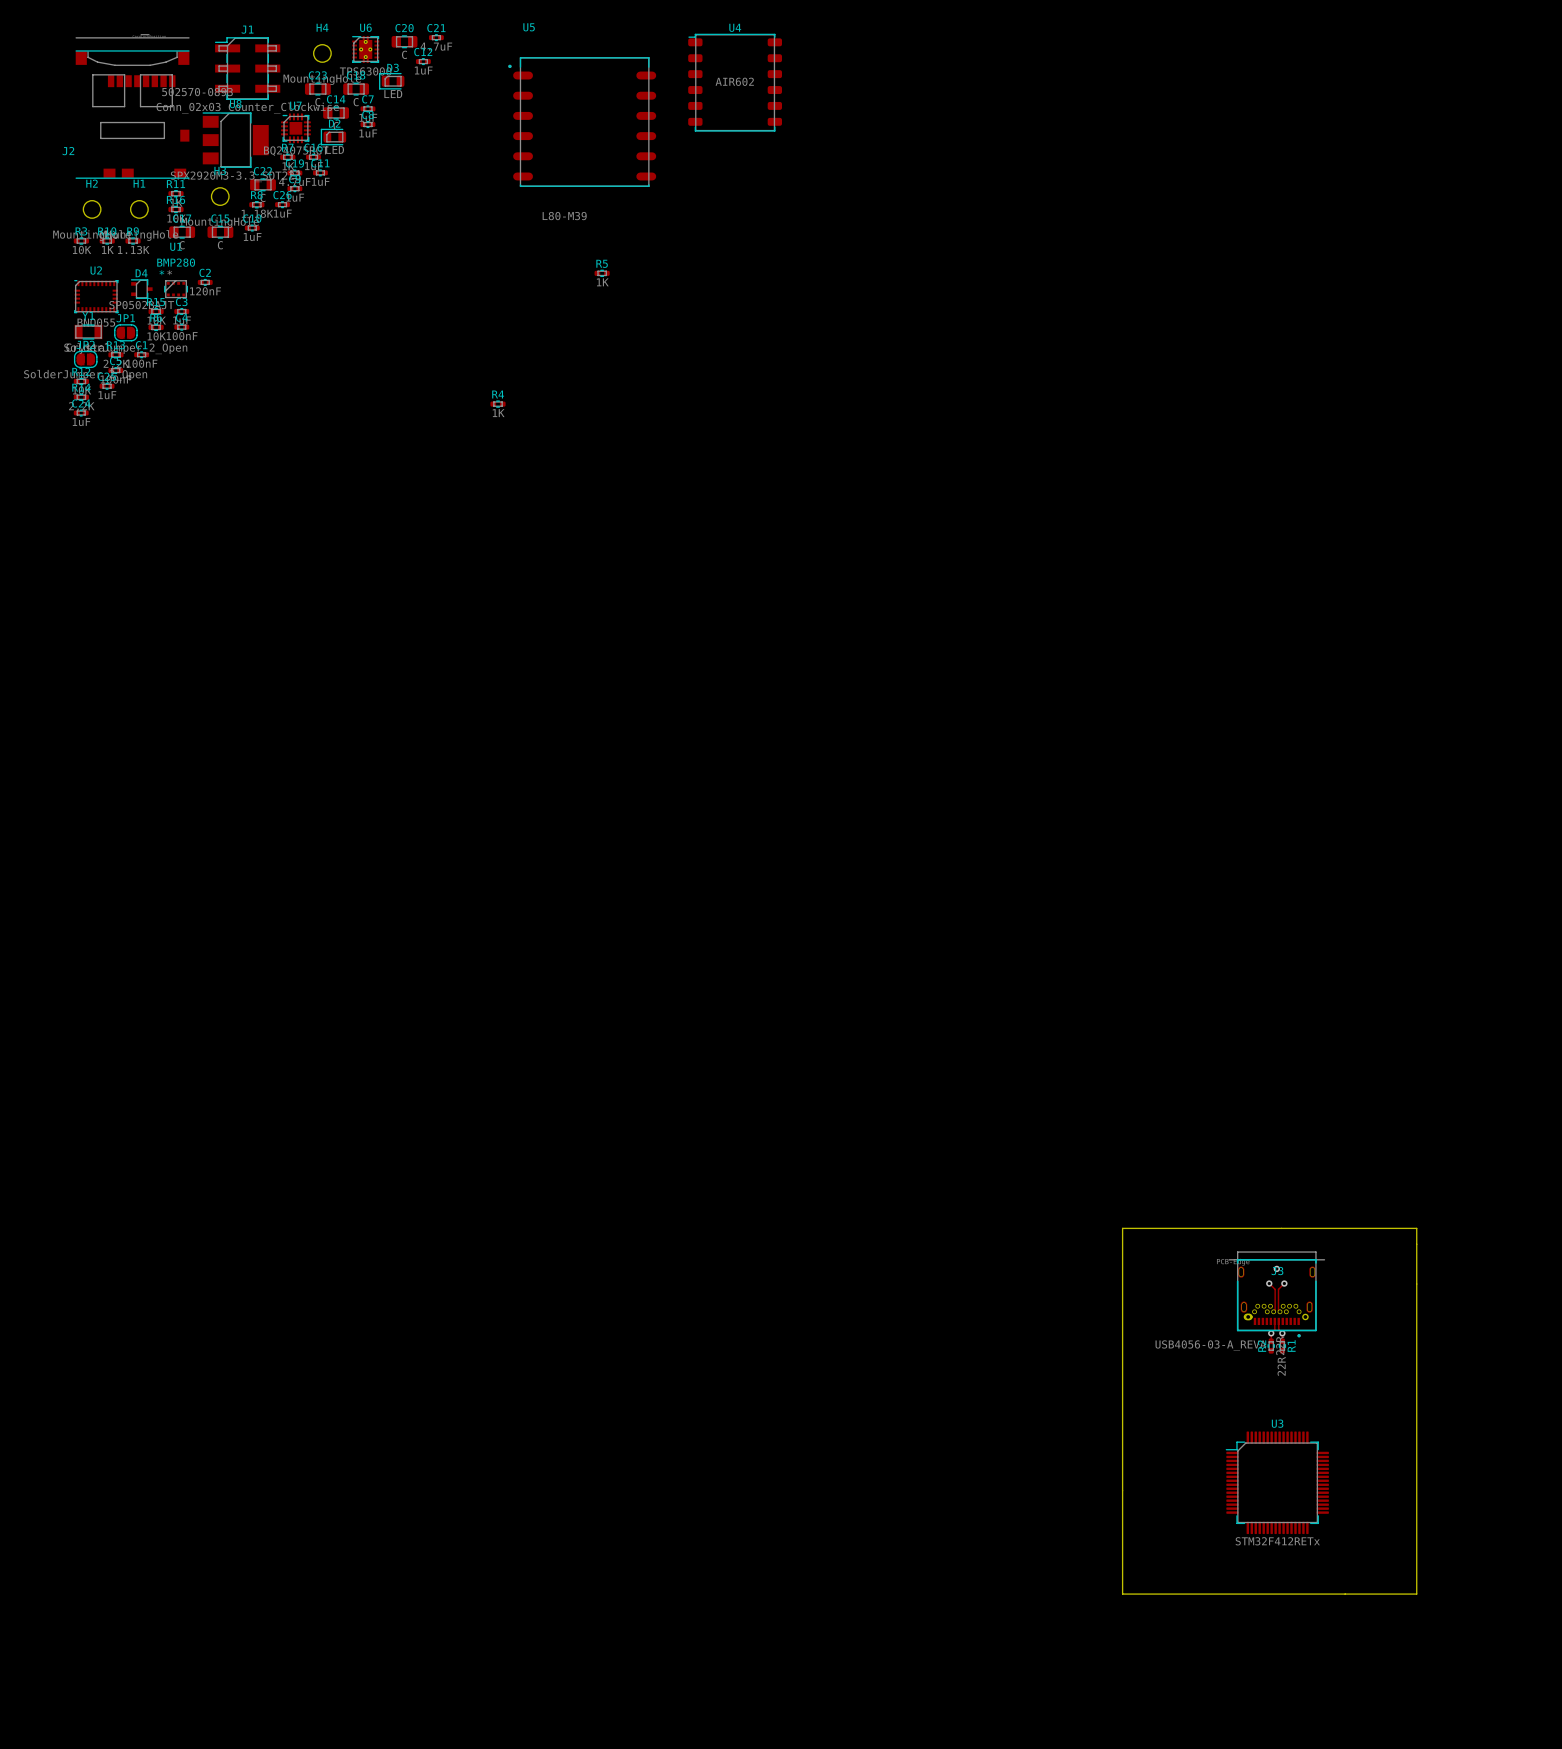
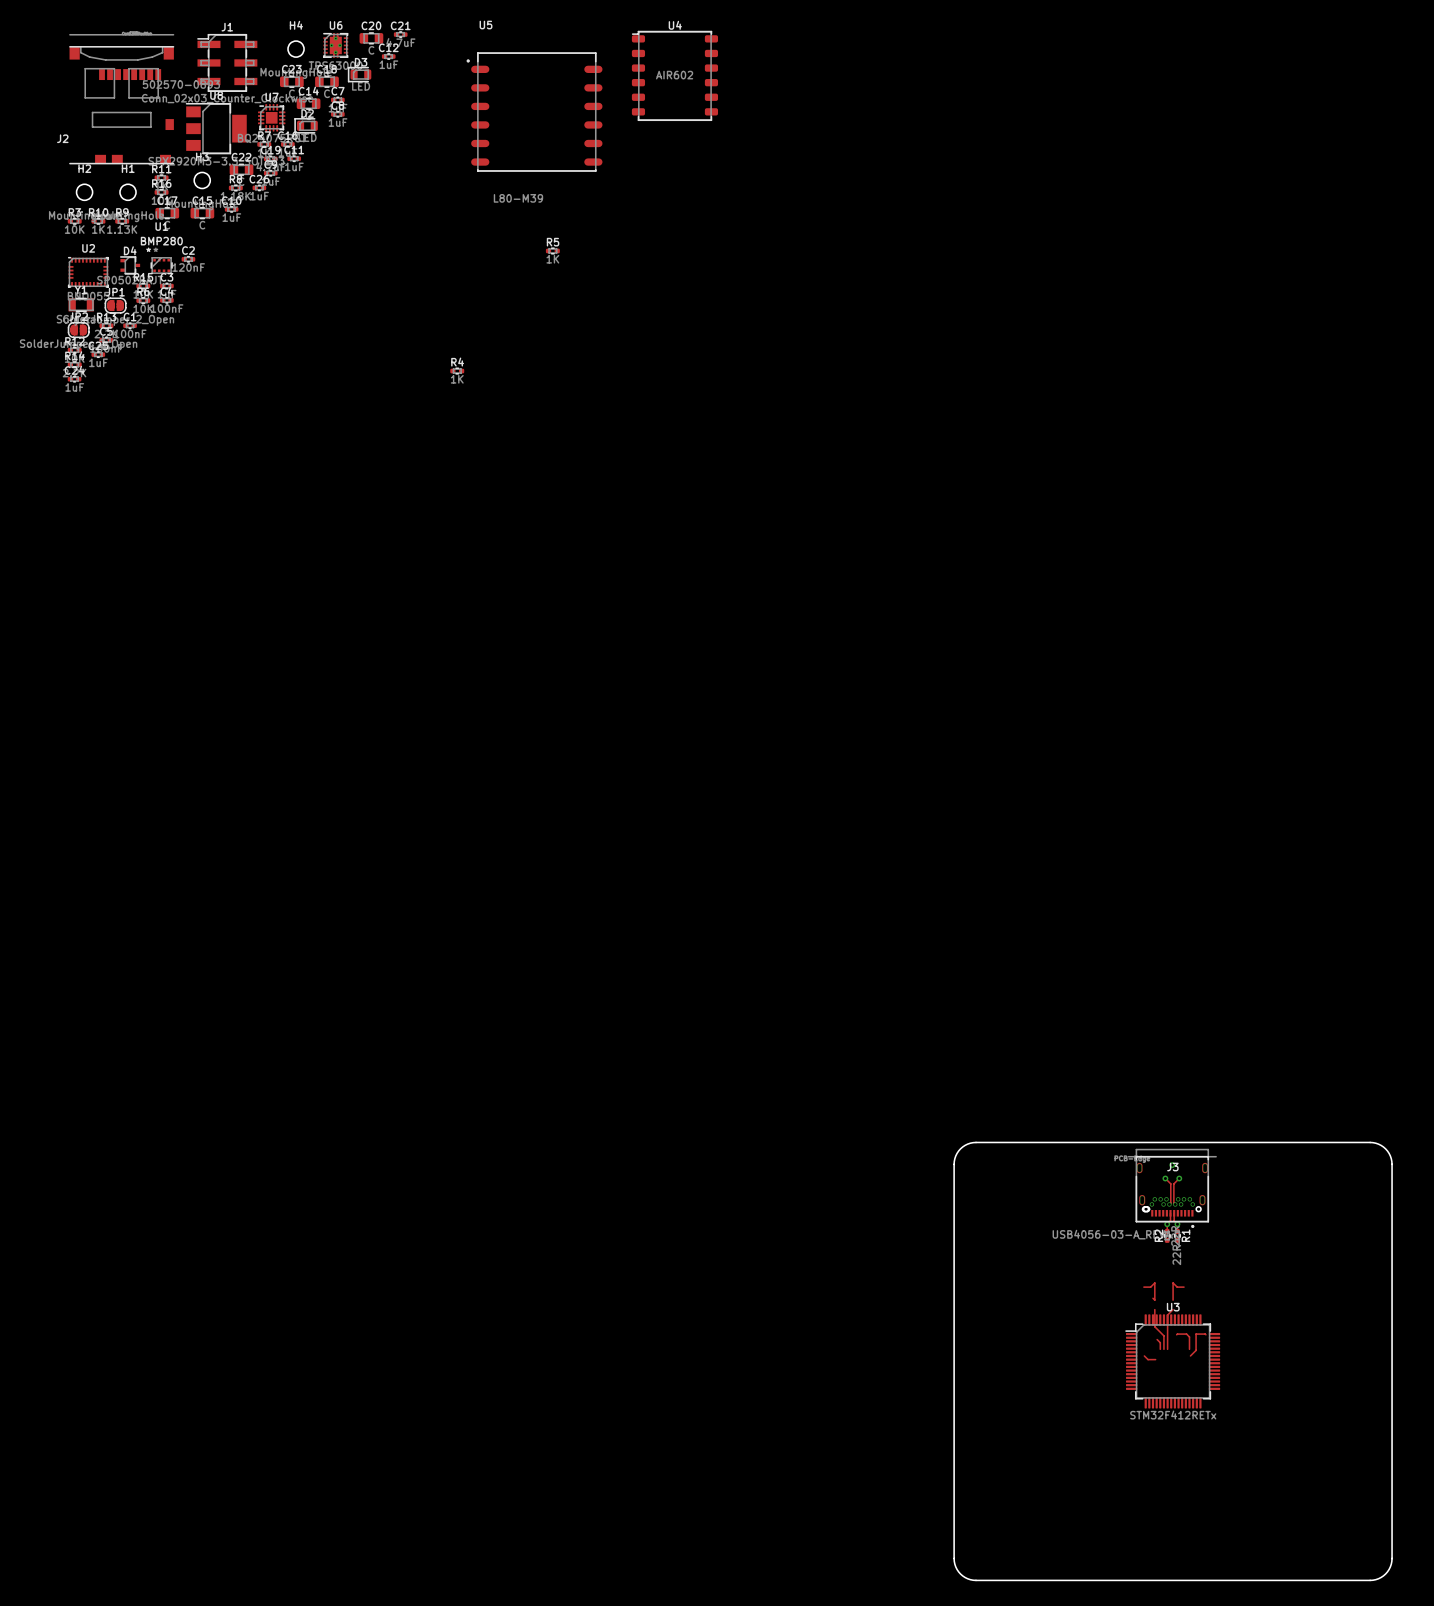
board edge: (1122, 1228) (1416, 1228) (1416, 1594) (1122, 1594) (1122, 1228) -> none
board edge: none -> (976, 1142) (1370, 1142) (1378, 1144) (1385, 1148) (1390, 1155) (1392, 1164) (1392, 1558) (1390, 1566) (1385, 1574) (1378, 1578) (1370, 1580) (976, 1580) (967, 1578) (960, 1574) (955, 1566) (954, 1558) (954, 1164) (955, 1155) (960, 1148) (967, 1144) (976, 1142)
track: none -> (1143, 1287) (1150, 1287) (1154, 1282) (1154, 1300) (1153, 1298)
track: none -> (1184, 1287) (1177, 1287) (1173, 1282) (1173, 1300)
track: none -> (1154, 1309) (1154, 1326) (1163, 1335) (1163, 1349)
track: none -> (1173, 1309) (1167, 1315) (1167, 1349)
track: none -> (1176, 1334) (1186, 1334) (1189, 1336) (1189, 1349)
track: none -> (1205, 1334) (1196, 1334) (1196, 1350) (1190, 1355)
track: none -> (1157, 1339) (1160, 1342) (1160, 1349)
track: none -> (1144, 1355) (1148, 1359) (1155, 1359)

